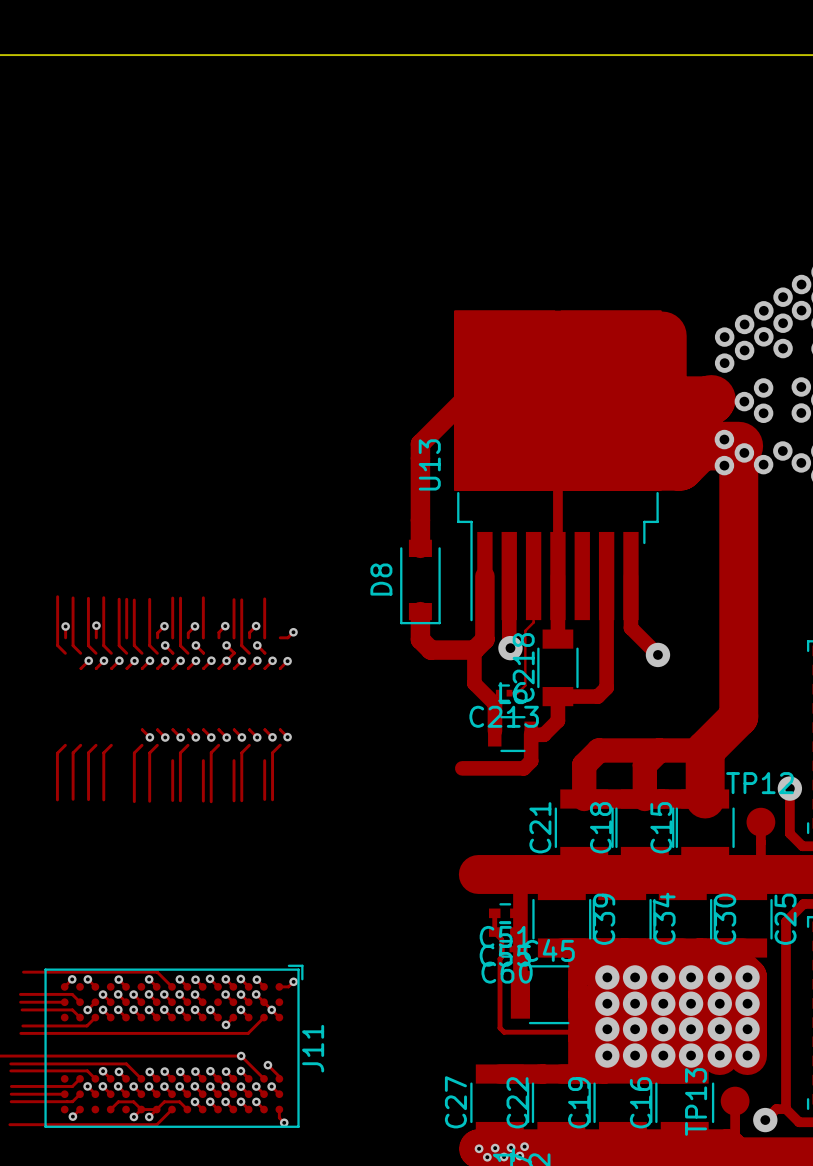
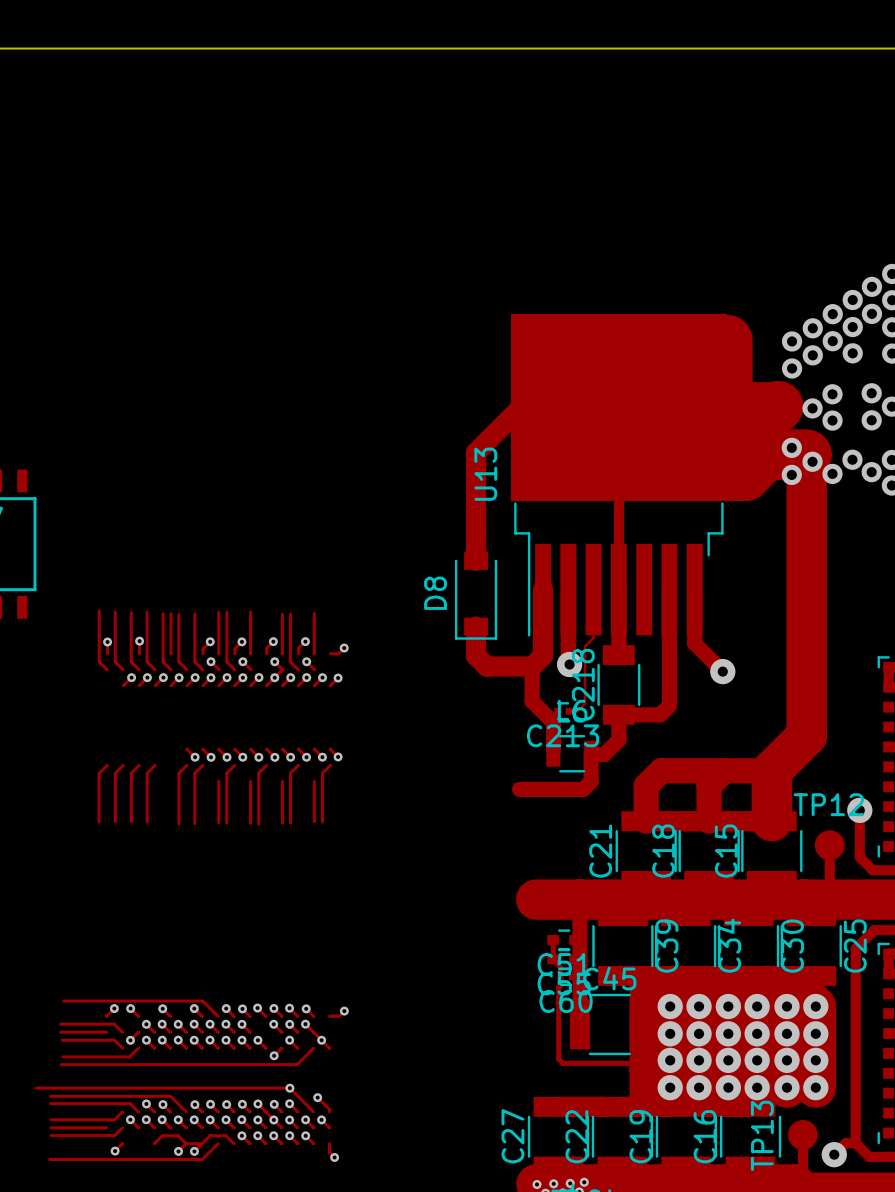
J11: (173, 1046) -> none

